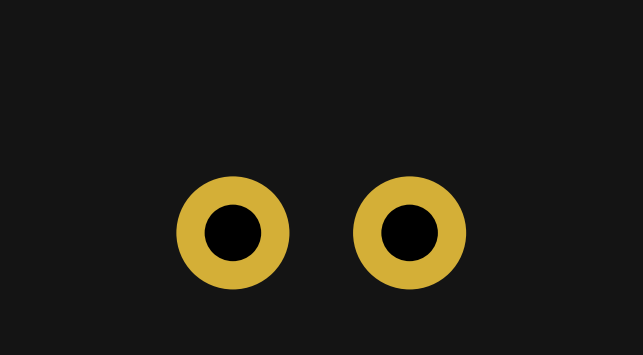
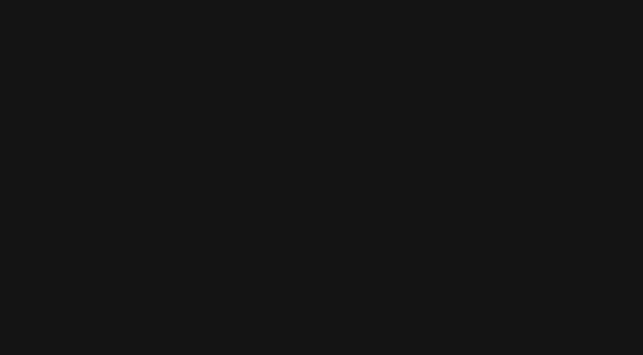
part: (321, 232) -> none

